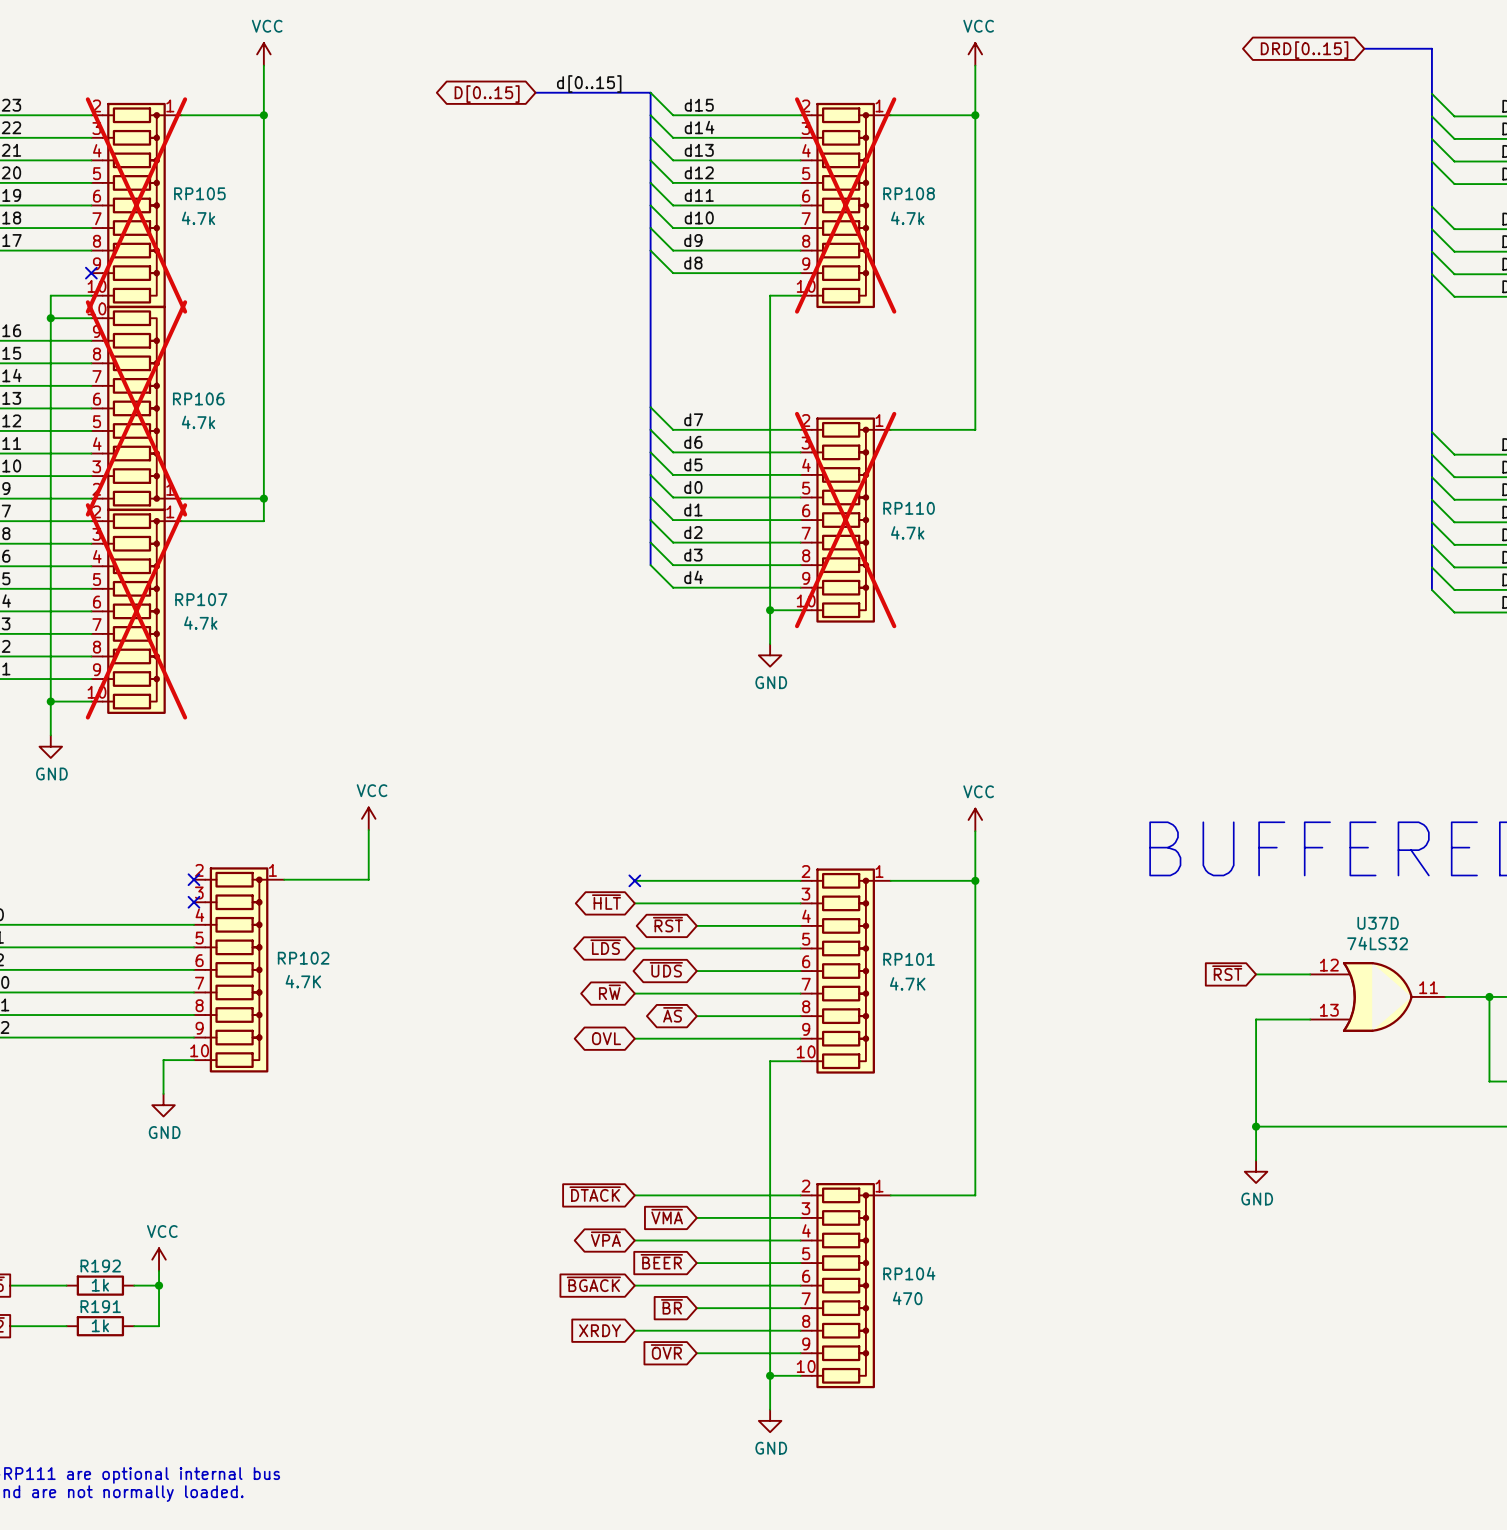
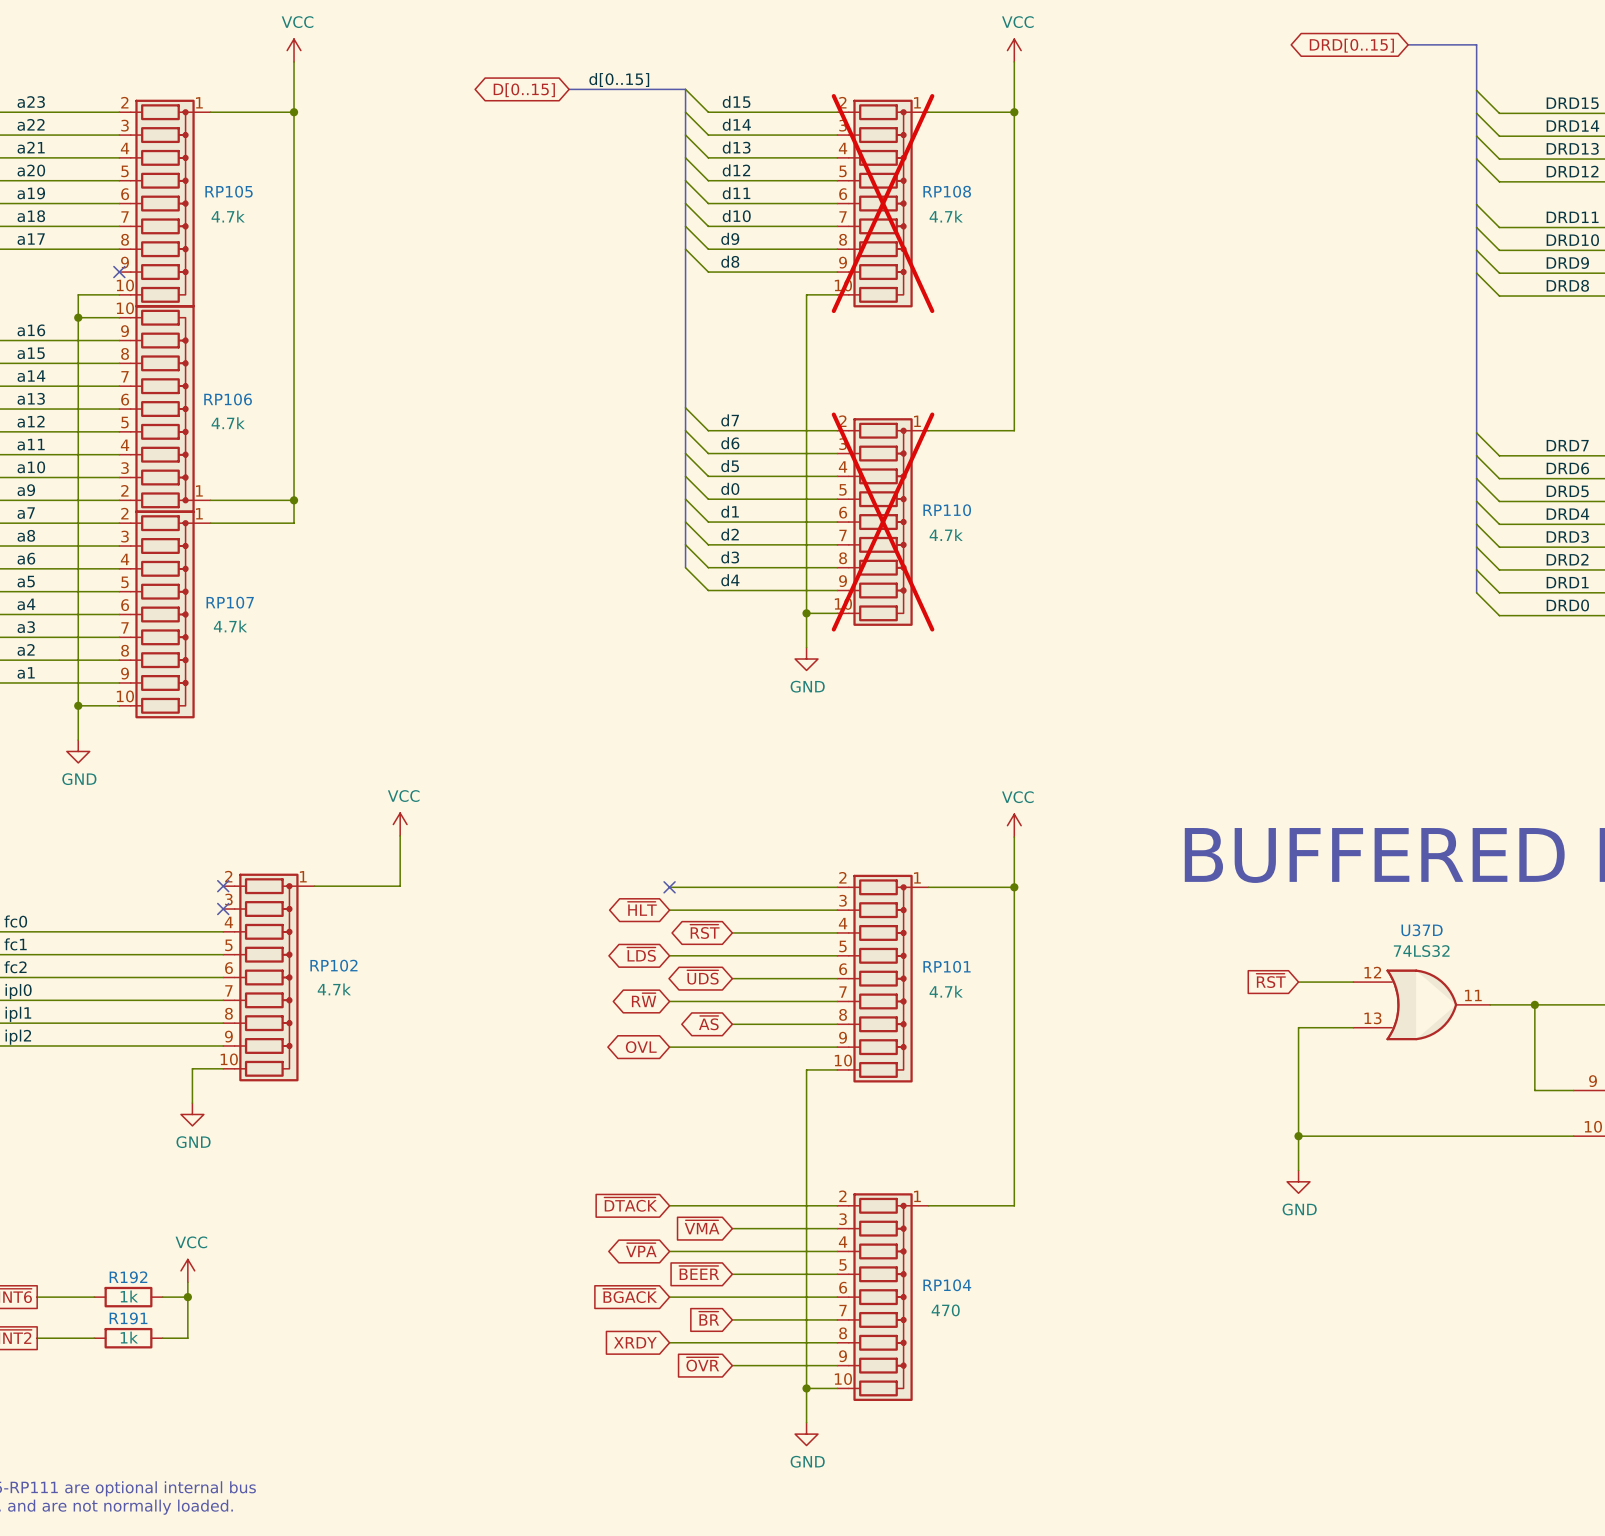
RP105 do-not-place cross: (136, 205) -> none
RP106 do-not-place cross: (136, 408) -> none
RP107 do-not-place cross: (136, 611) -> none
RP102 value: 4.7K (303, 981) -> 4.7k (334, 989)
RP101 value: 4.7K (907, 983) -> 4.7k (946, 991)

